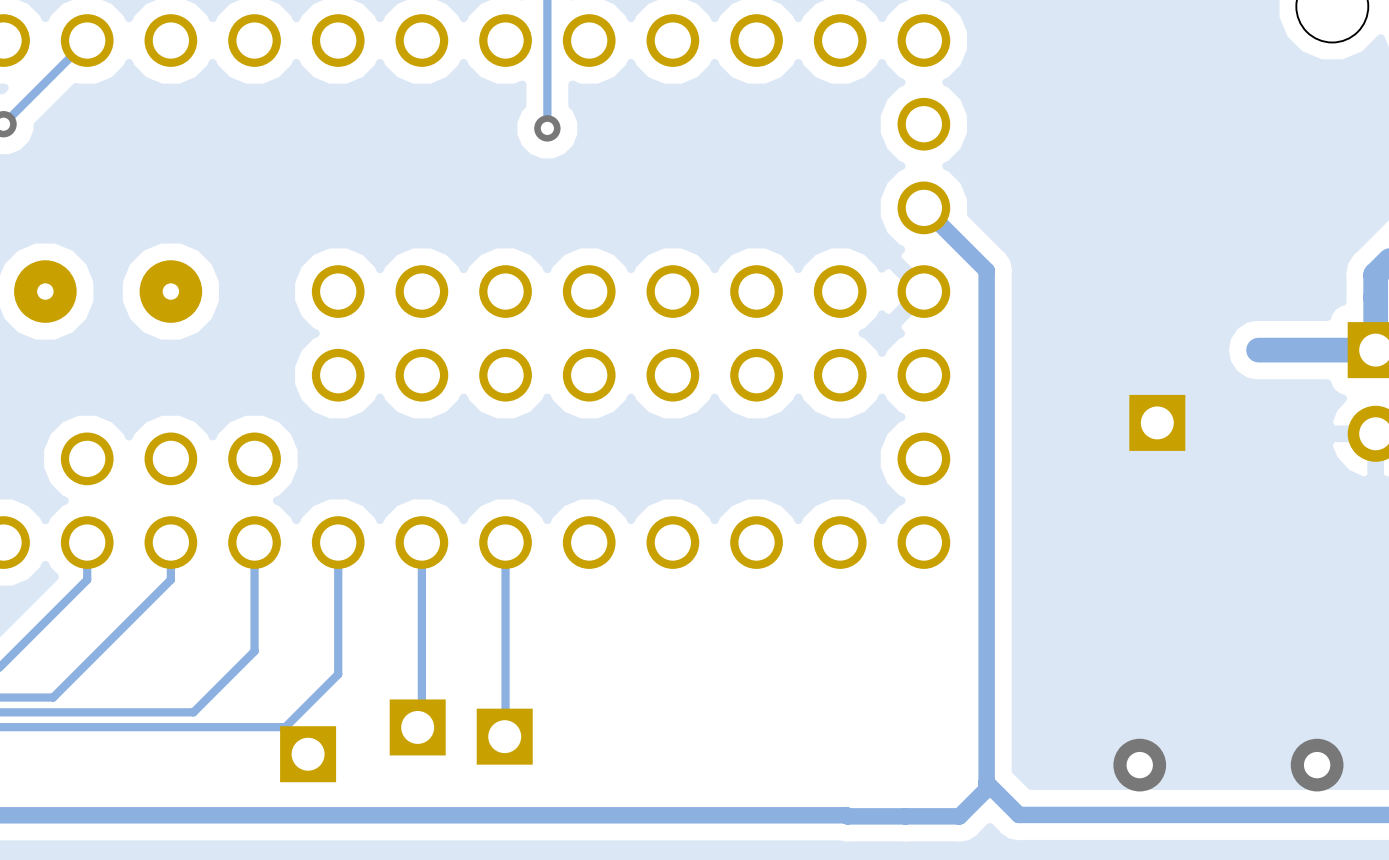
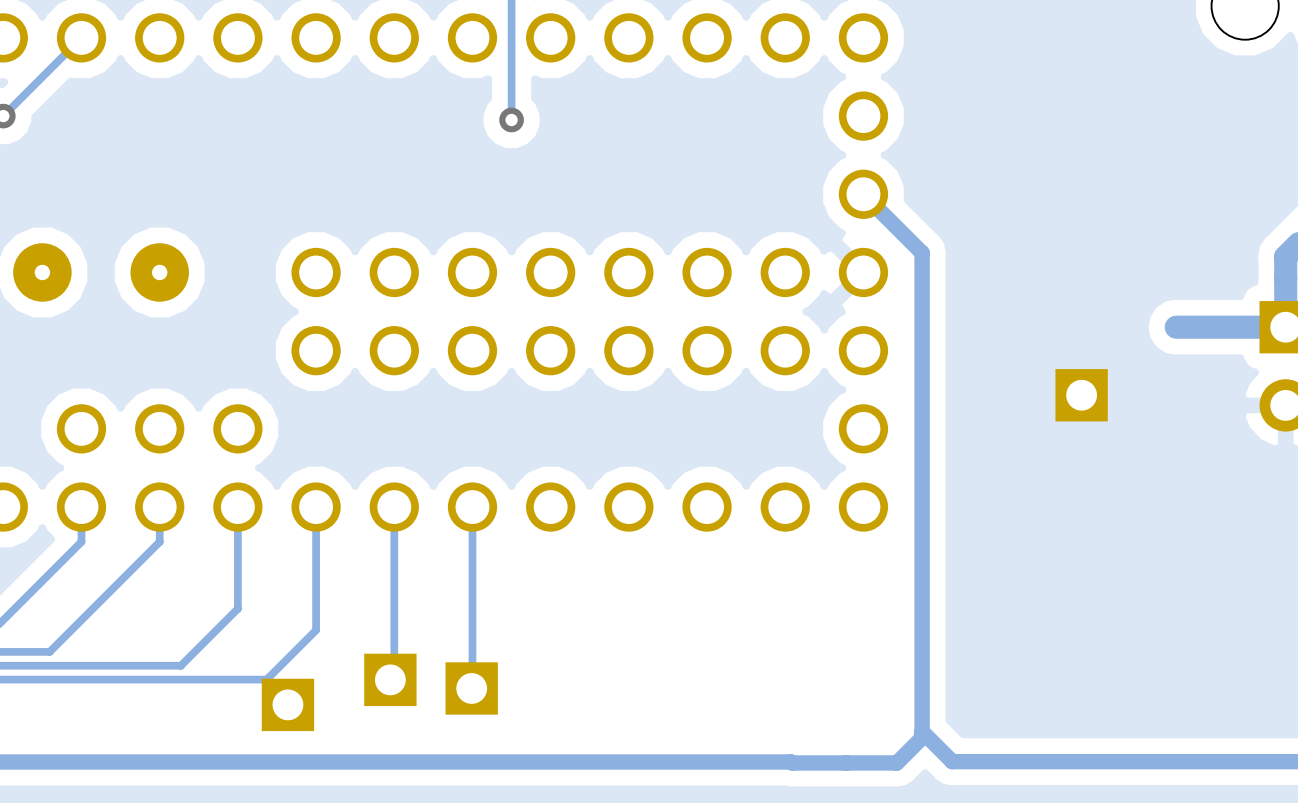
via: (1139, 765) -> none
via: (1317, 765) -> none

